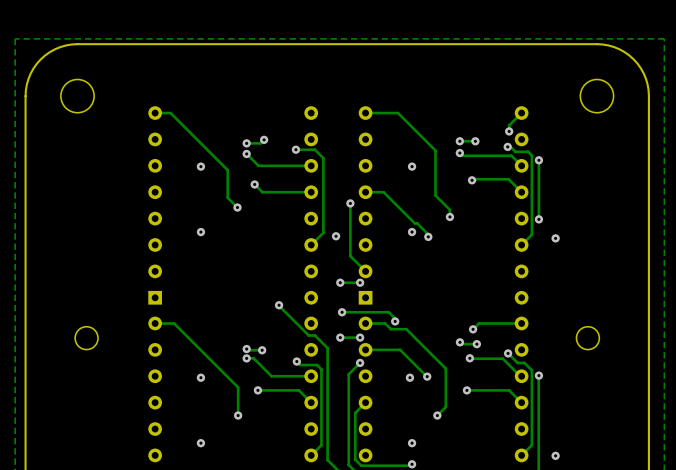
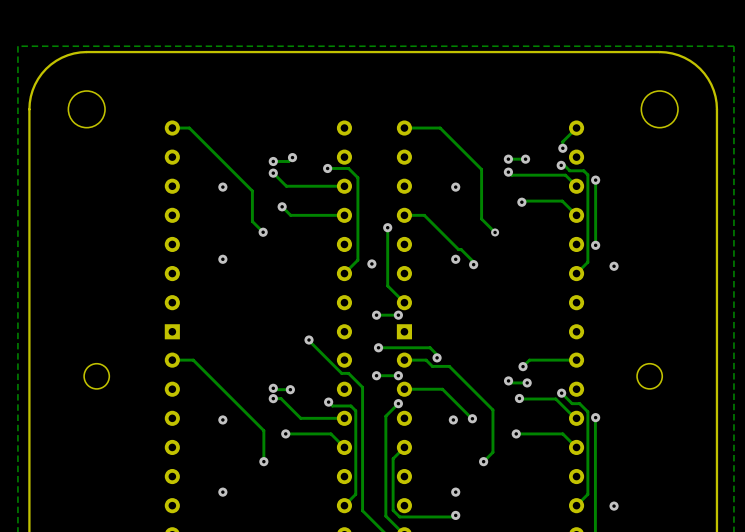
track: (447, 207) (449, 209) (449, 216) -> none
via: none -> (495, 232)
via: (449, 216) -> none

